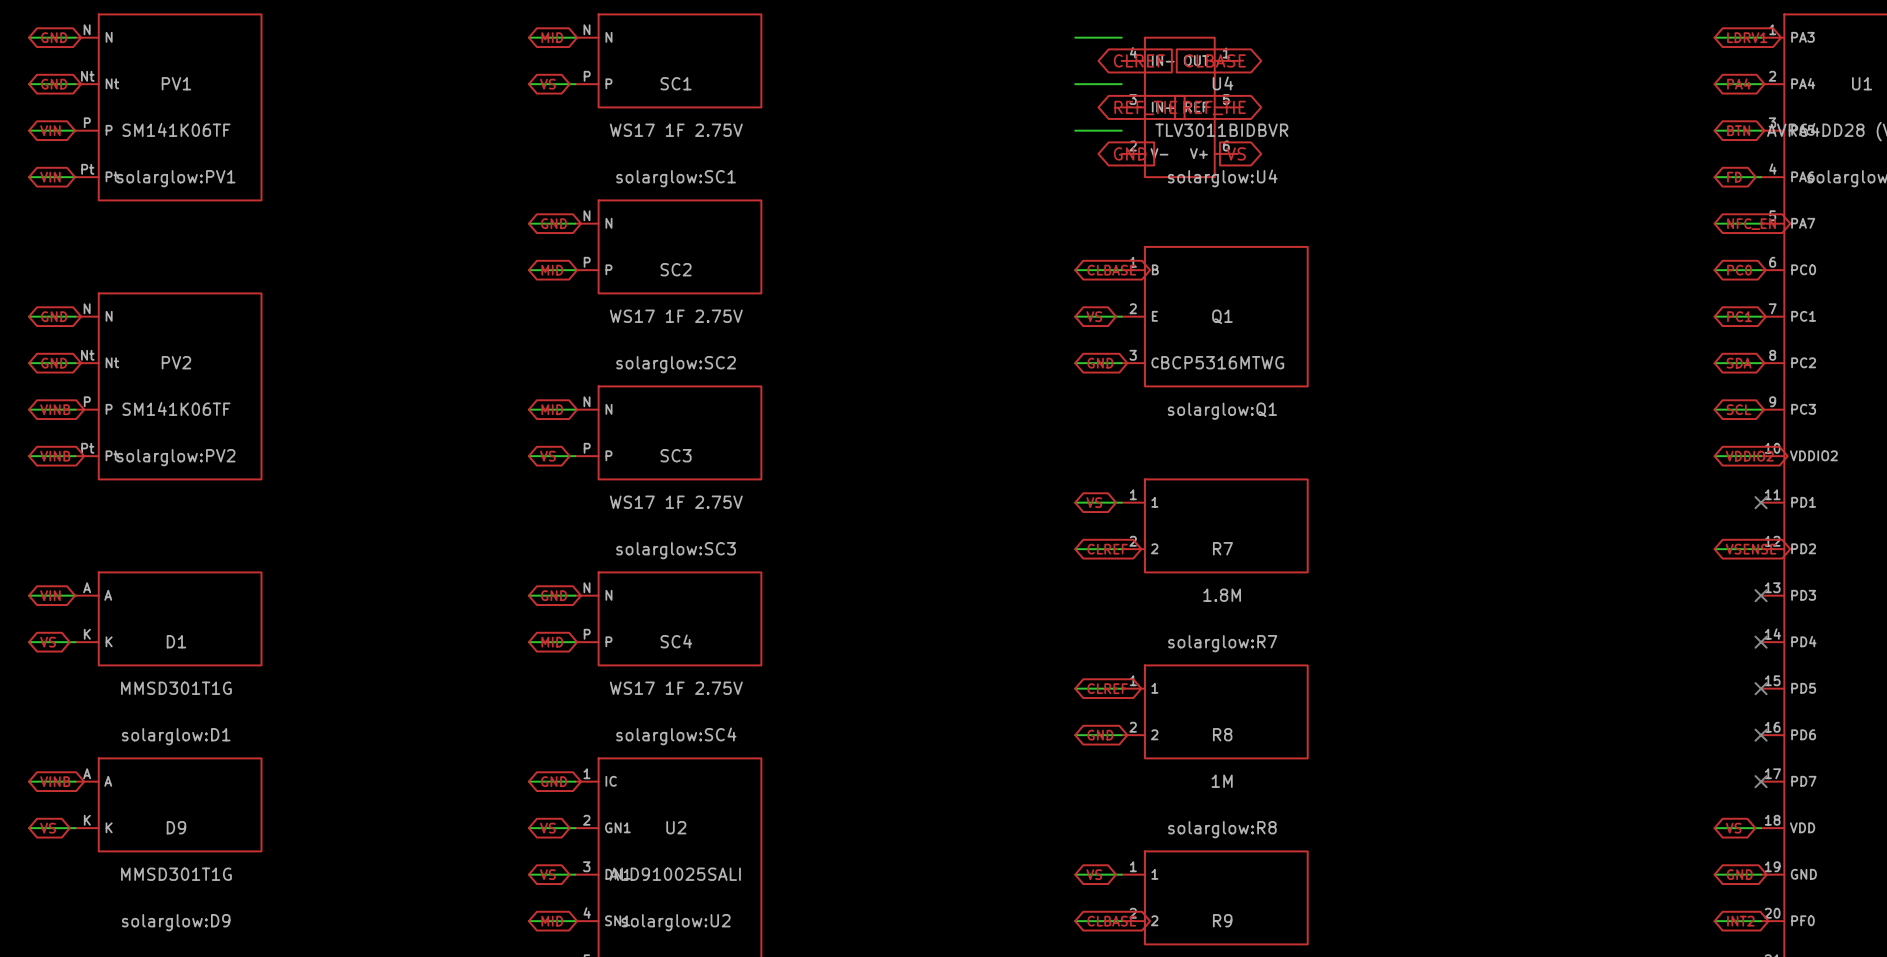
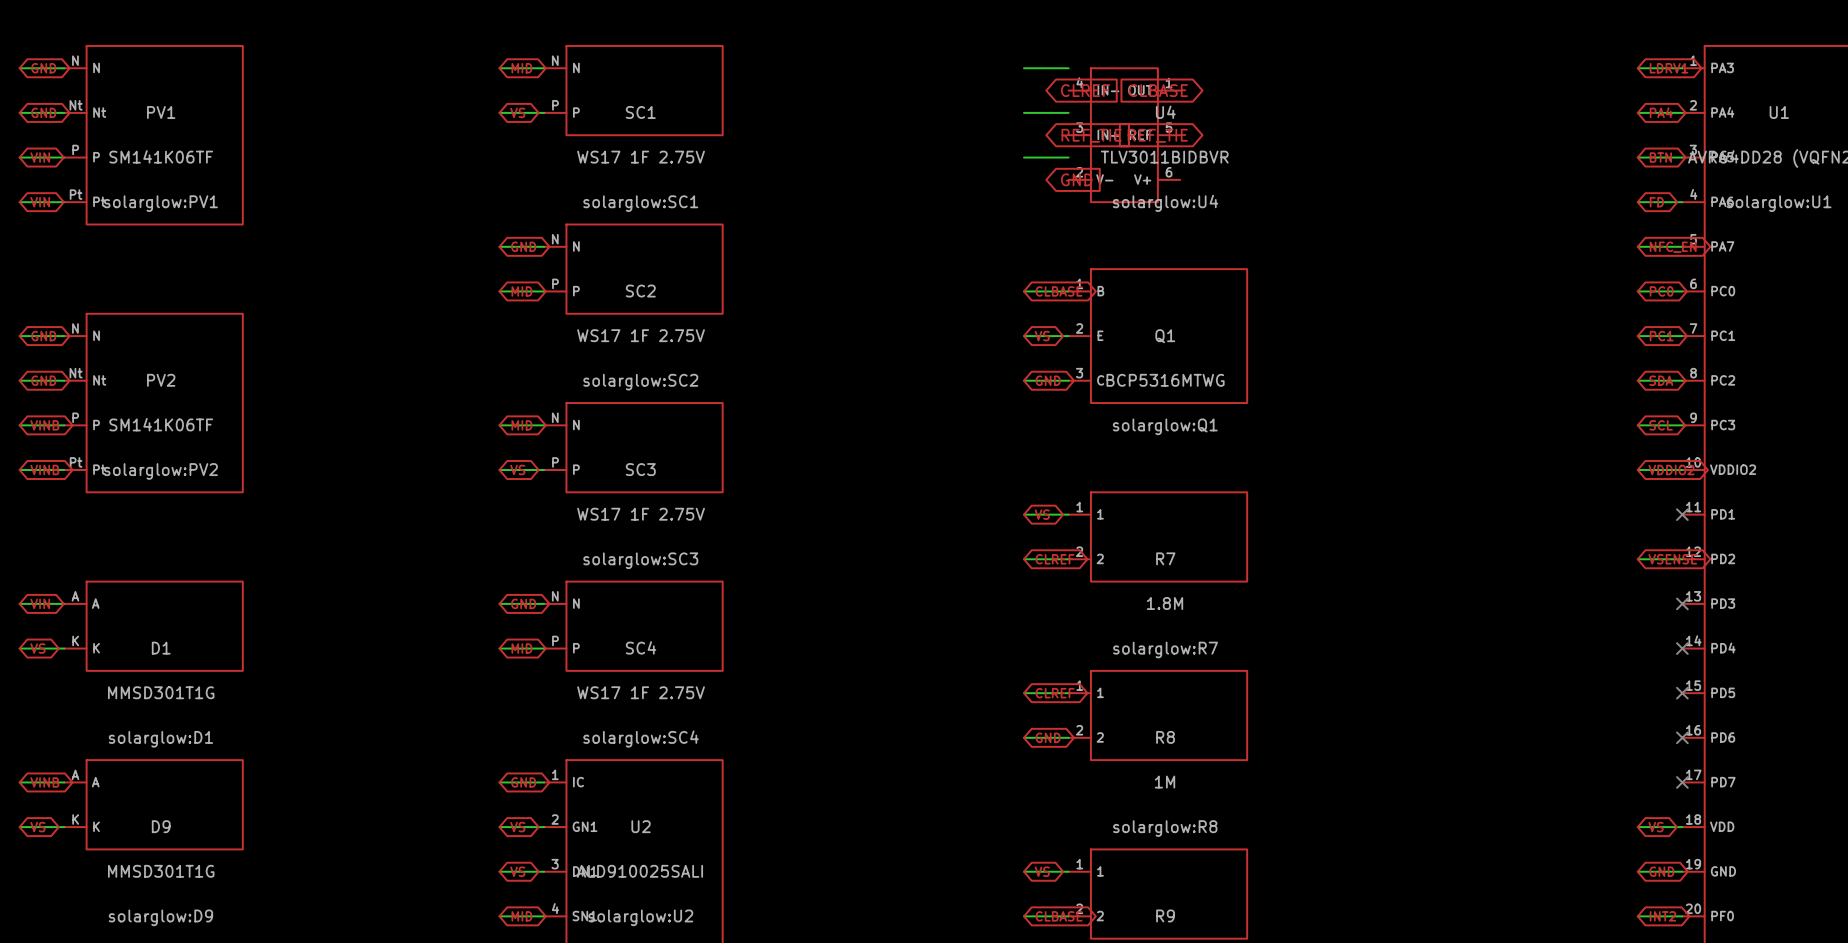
global label: VS (1236, 153) -> none

